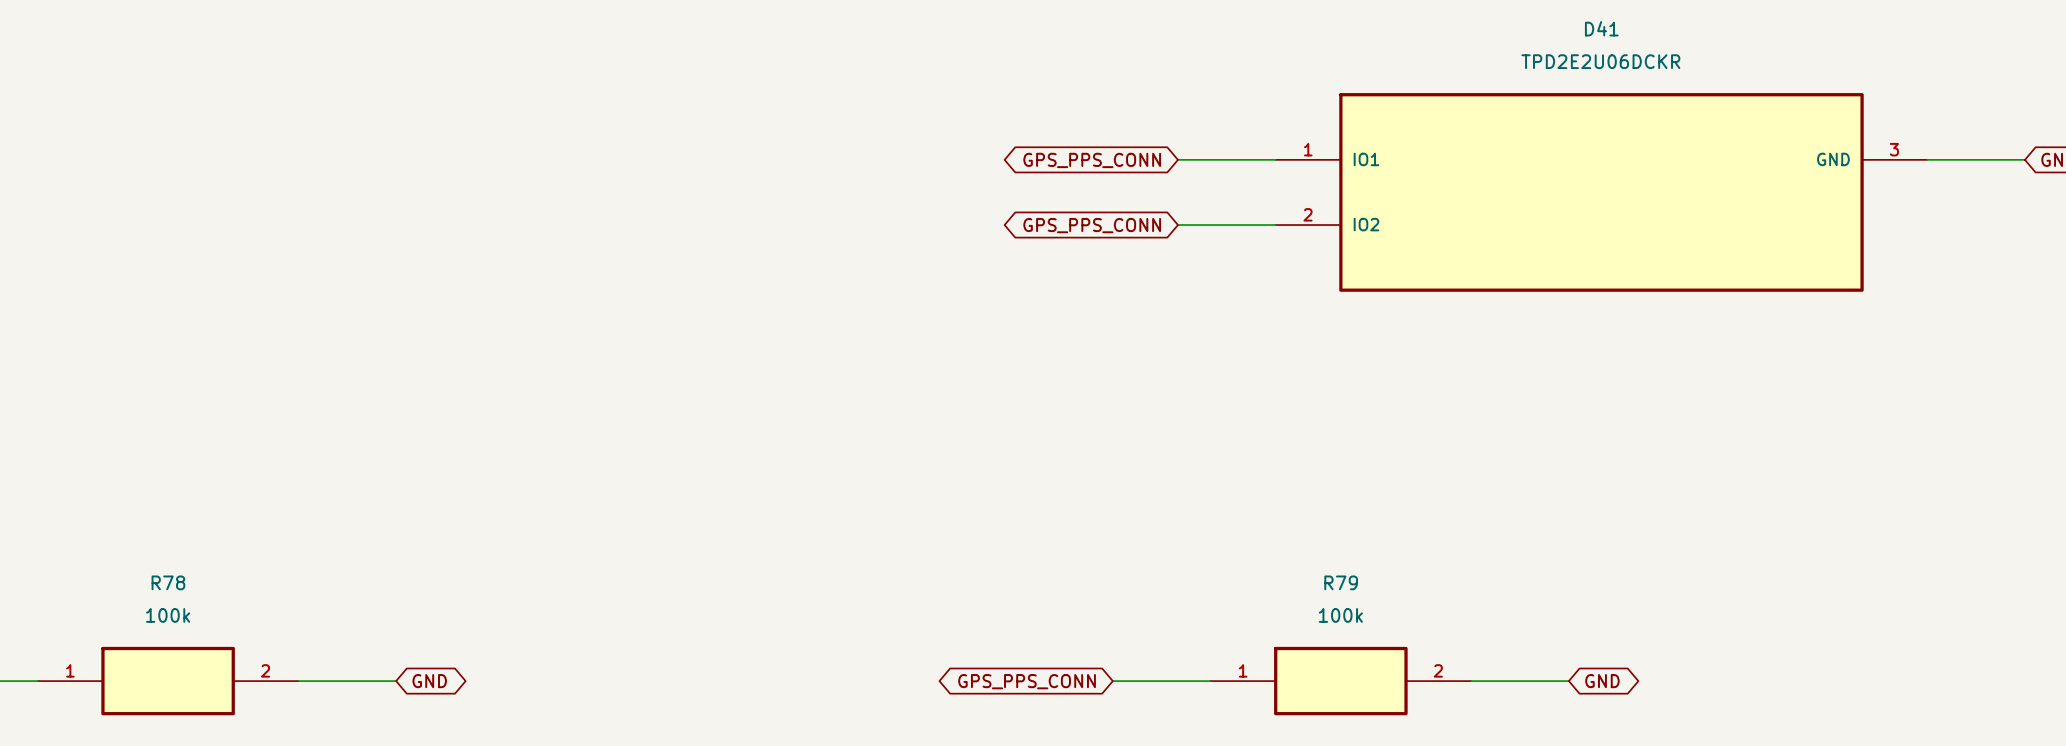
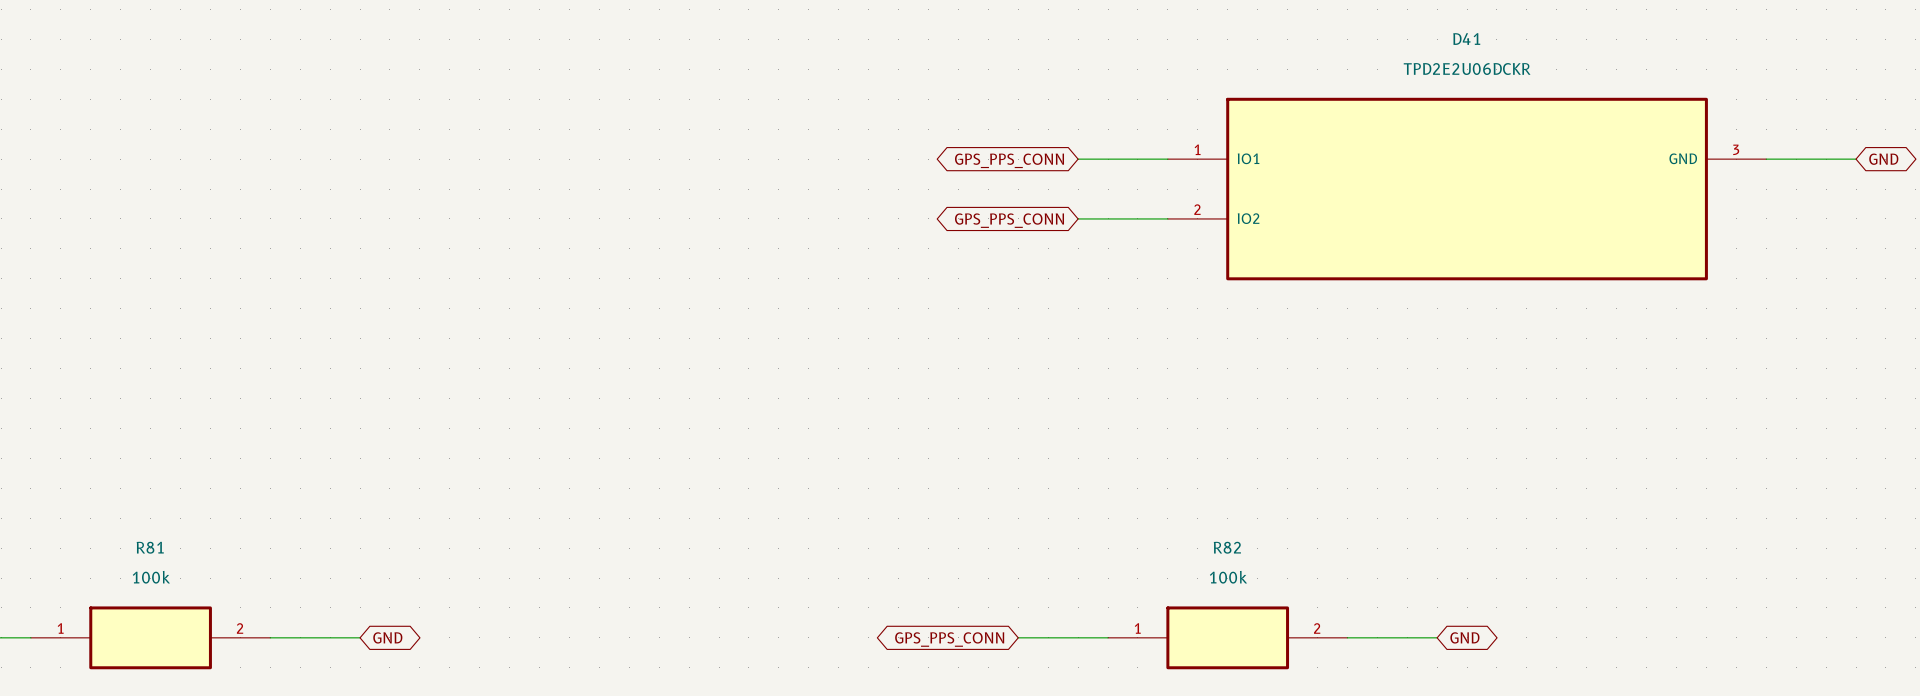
R78 name: R78 (168, 582) -> R81 (150, 547)
R79 name: R79 (1341, 582) -> R82 (1227, 547)

